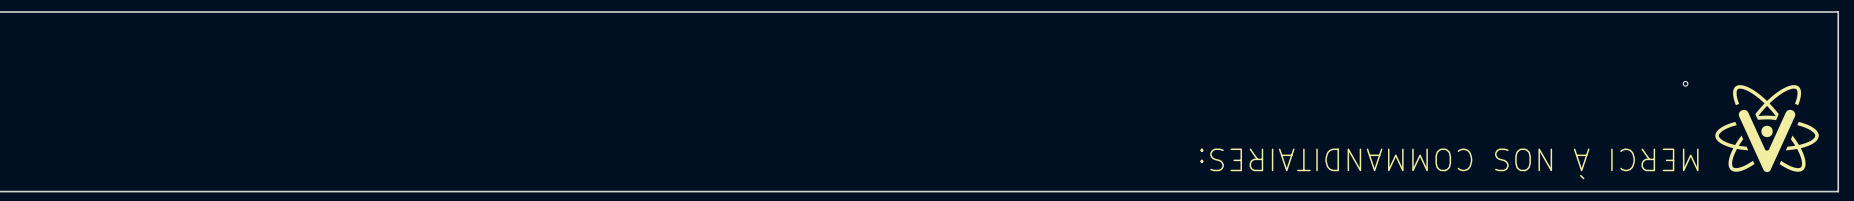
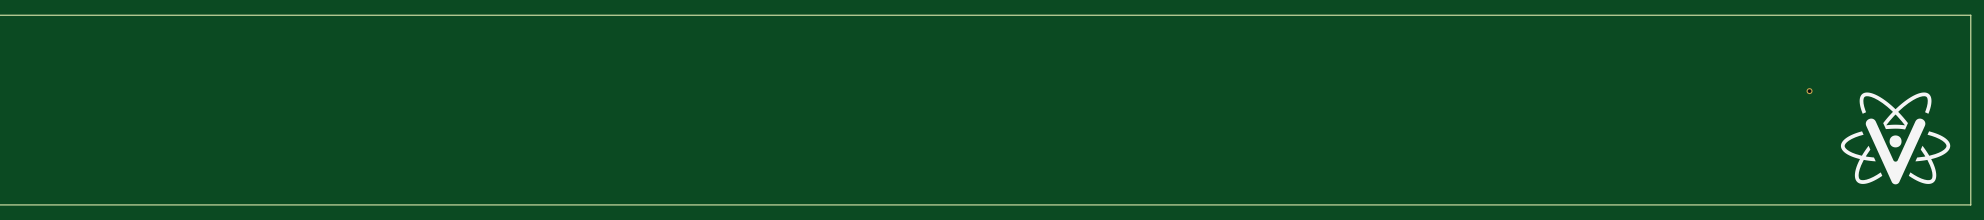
text: MERCI À NOS COMMANDITAIRES: (1449, 163) -> none

